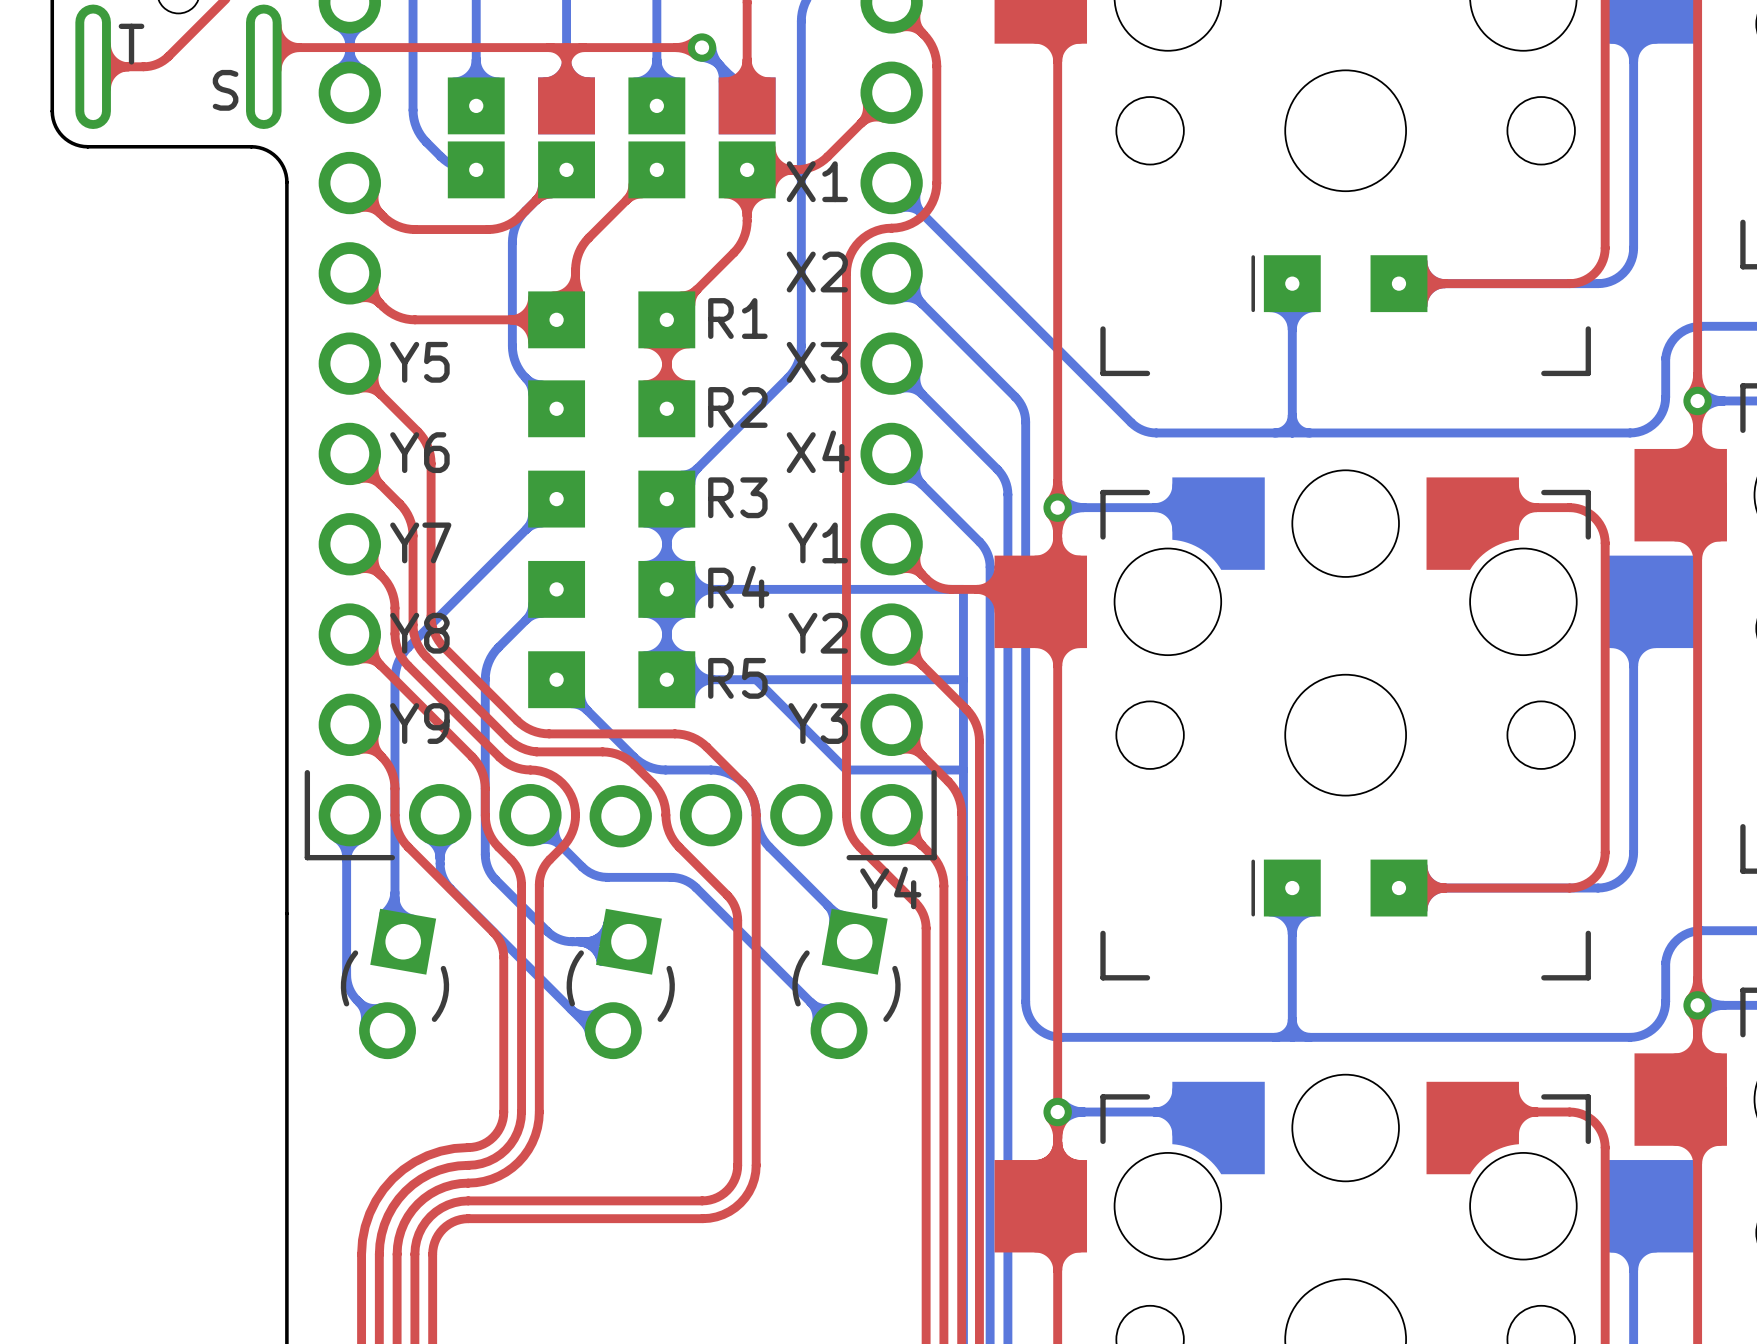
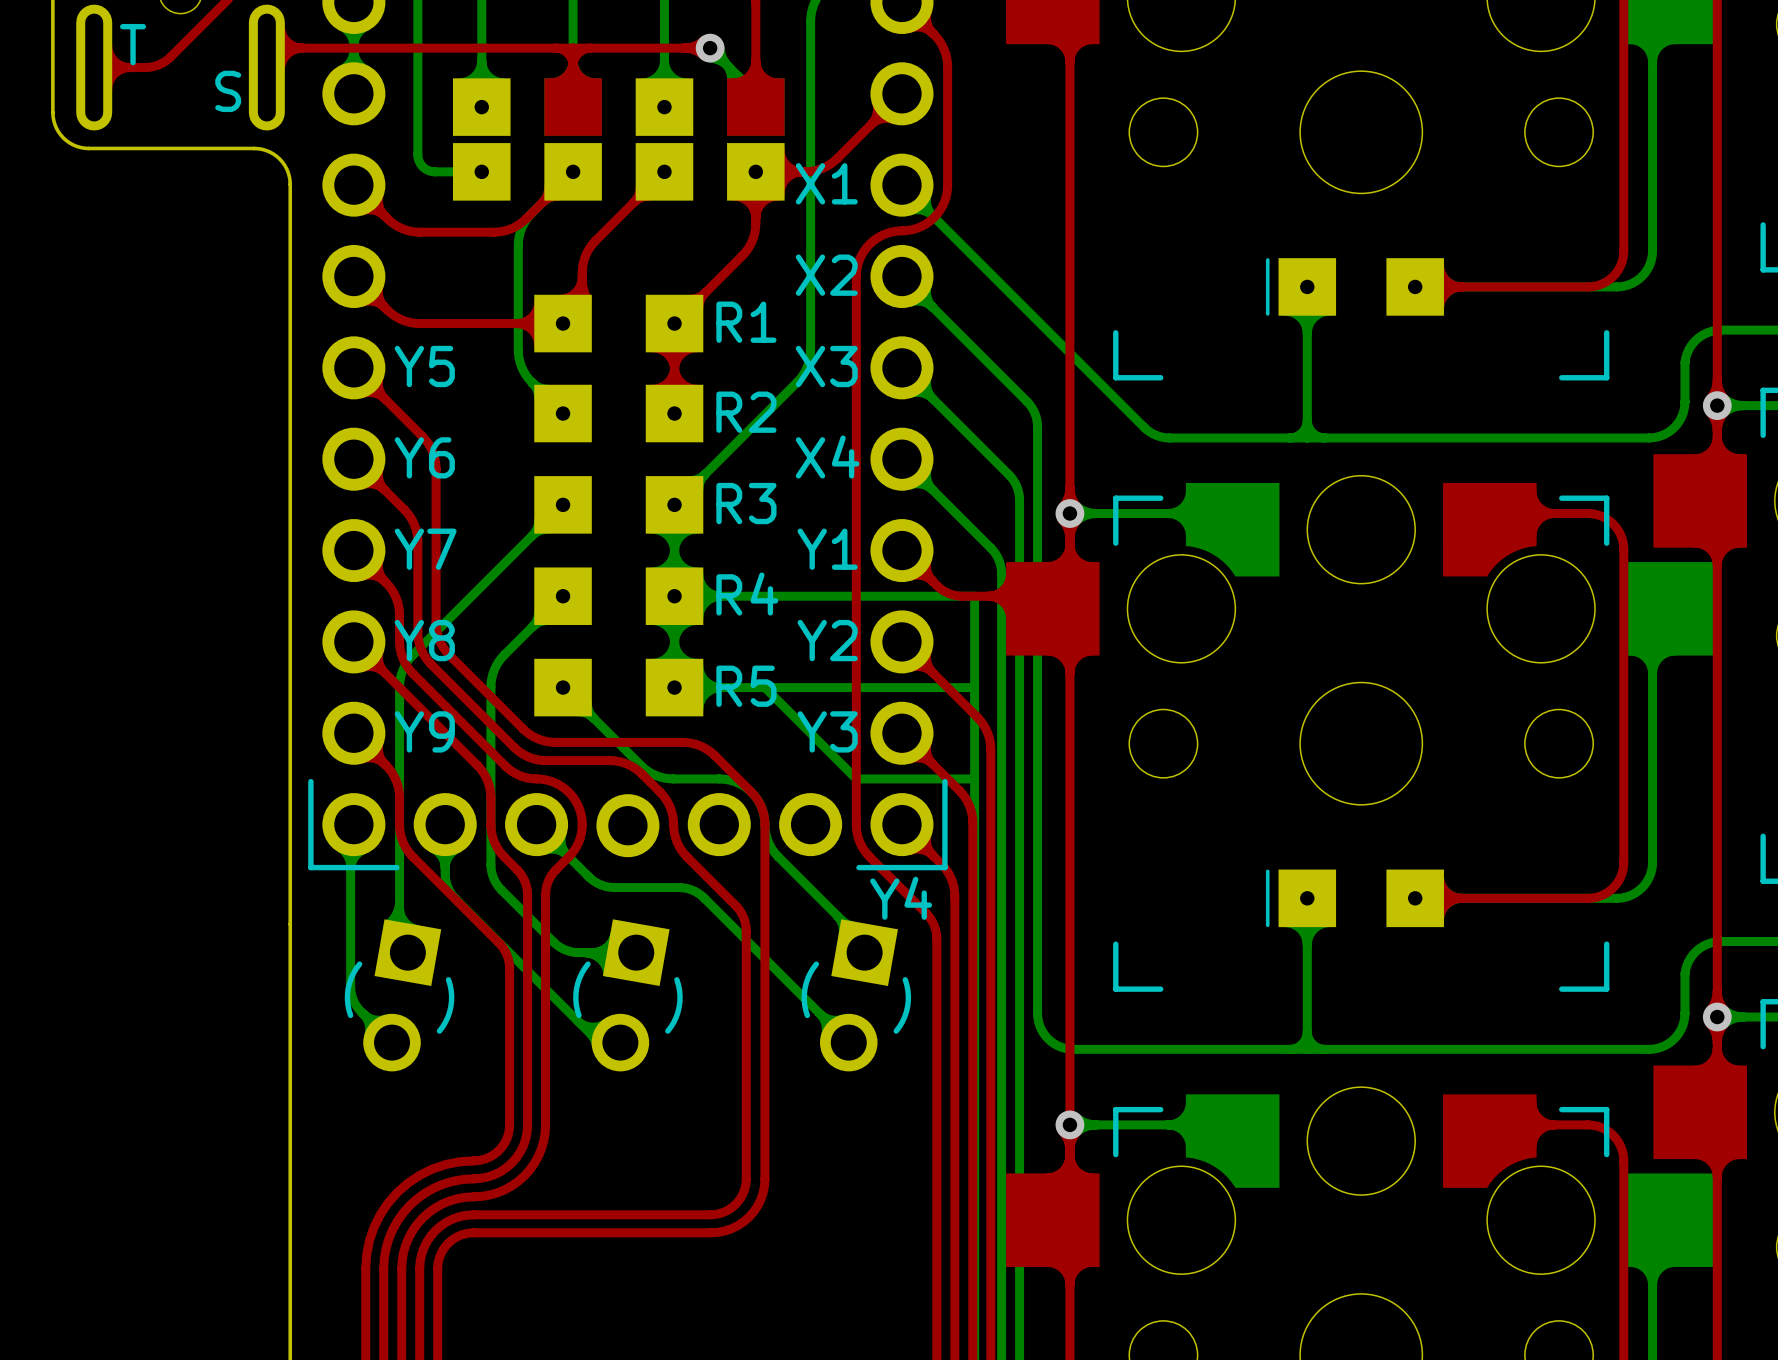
bottom track: (413, 110) (418, 131) (440, 156) (455, 166) (472, 169) -> (417, 111) (417, 156) (422, 166) (432, 171) (478, 171)

